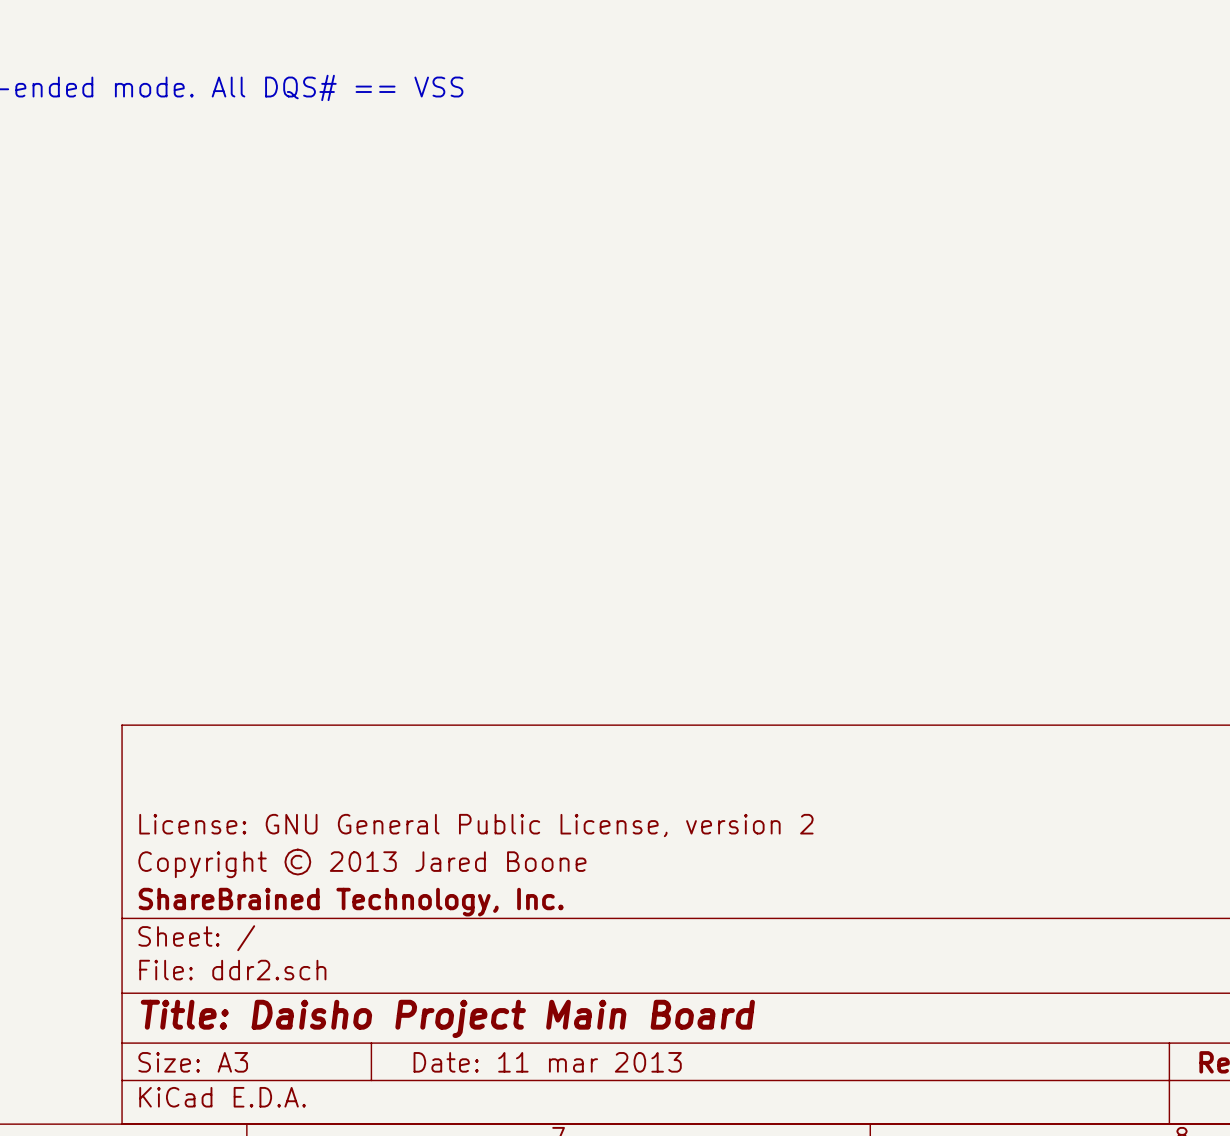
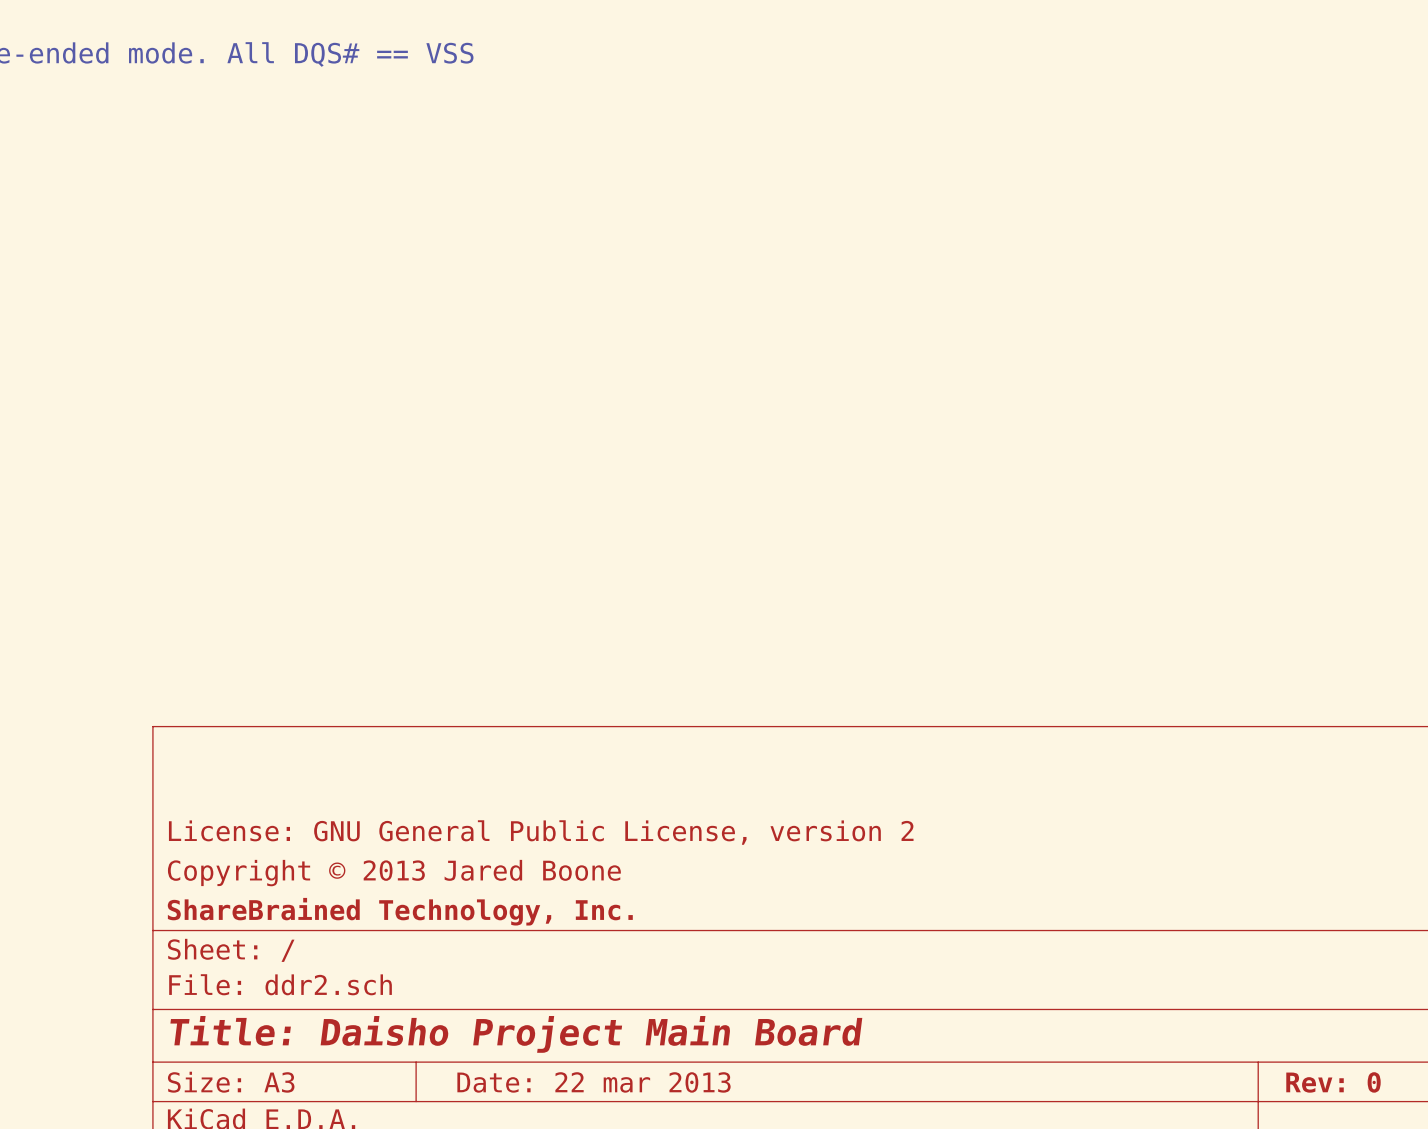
title block: Date: 11 mar 2013 (547, 1062) -> Date: 22 mar 2013 (594, 1082)

